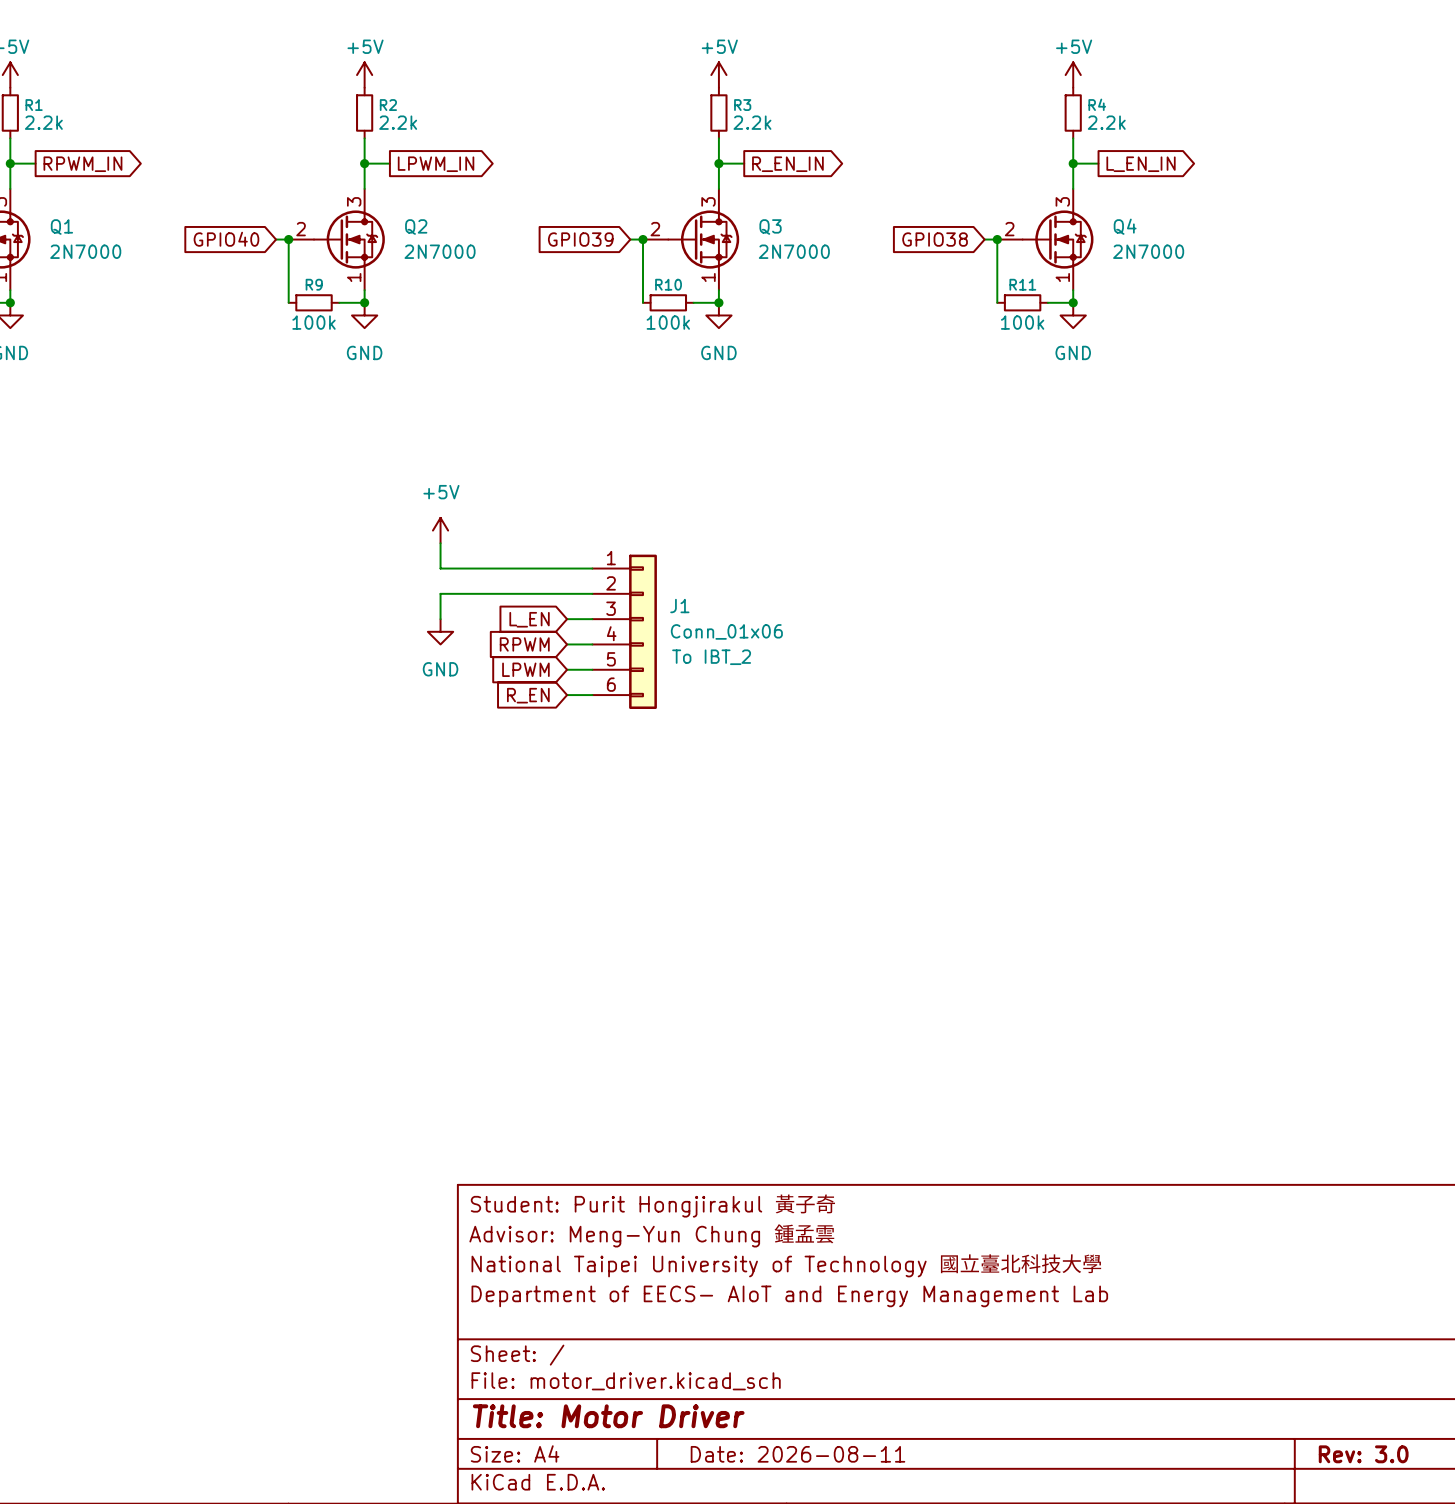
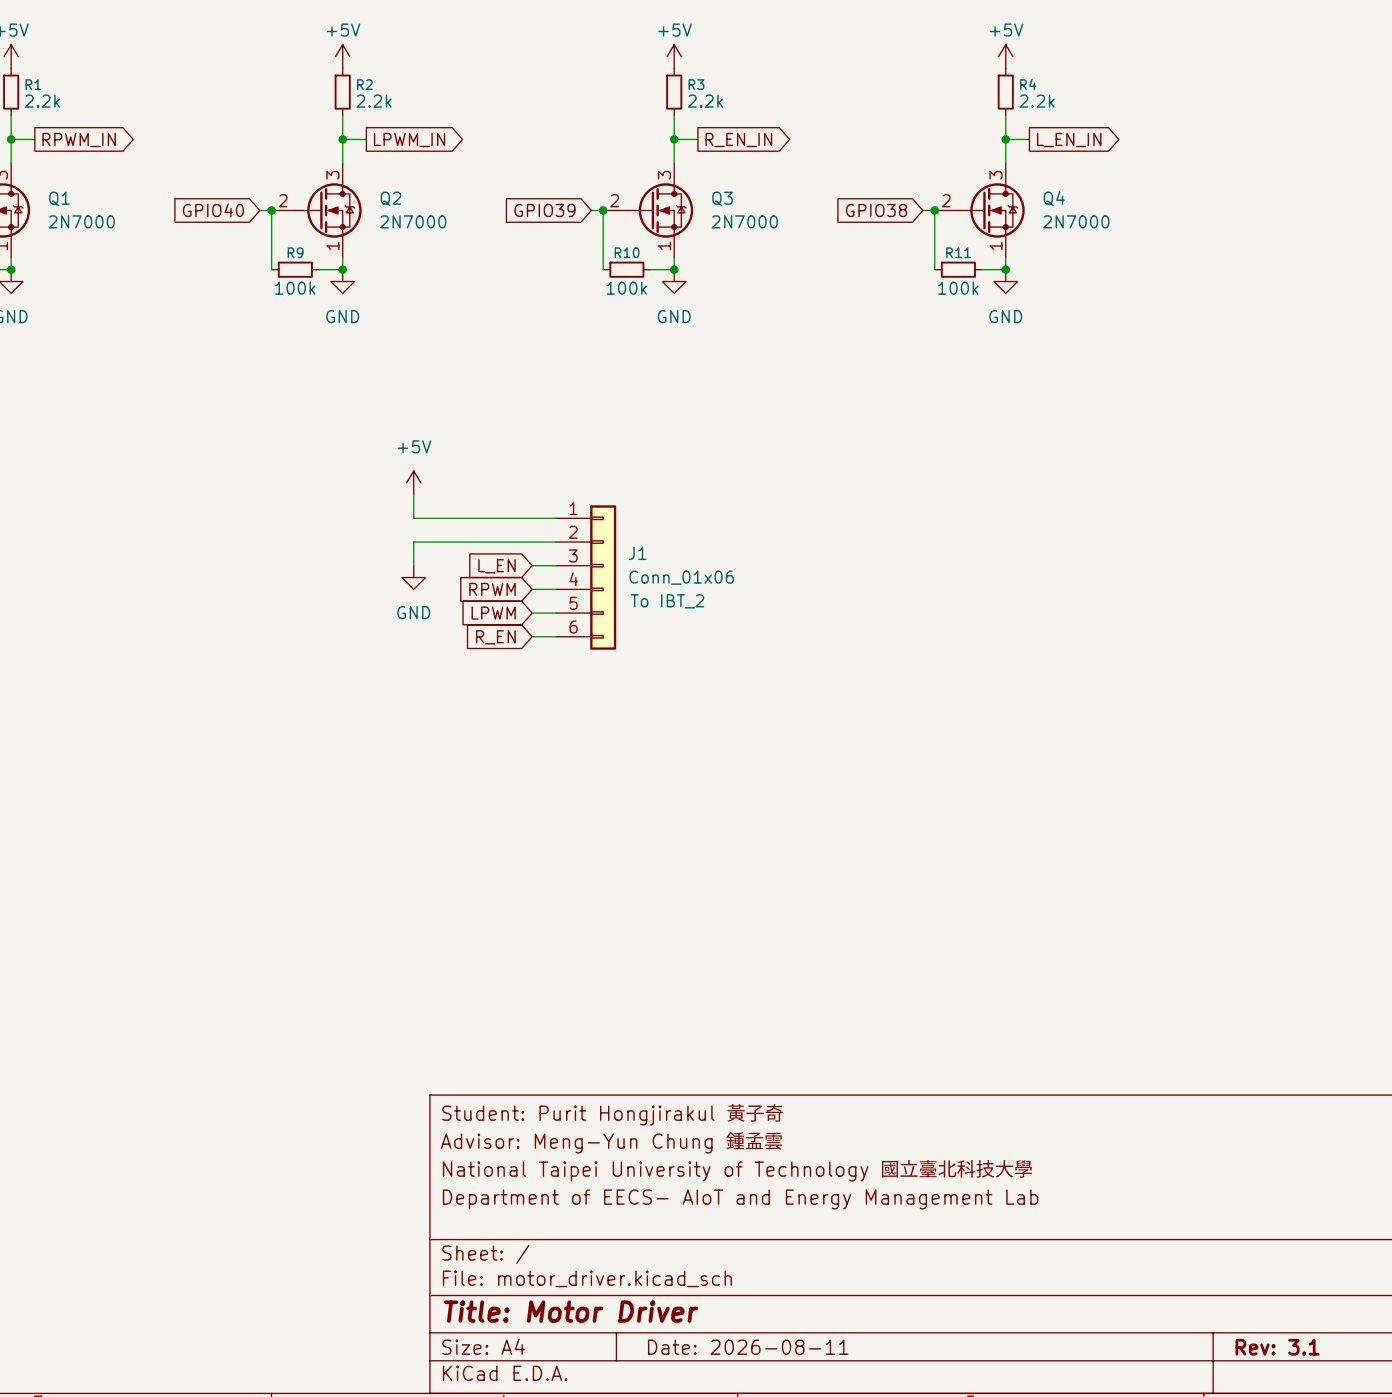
title block: Rev: 3.0 (1363, 1454) -> Rev: 3.1 (1277, 1347)

